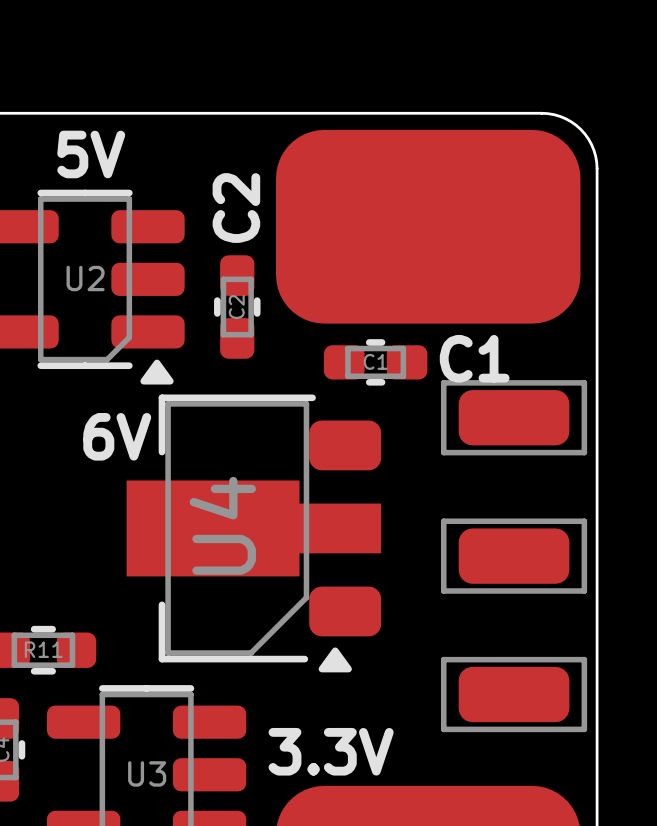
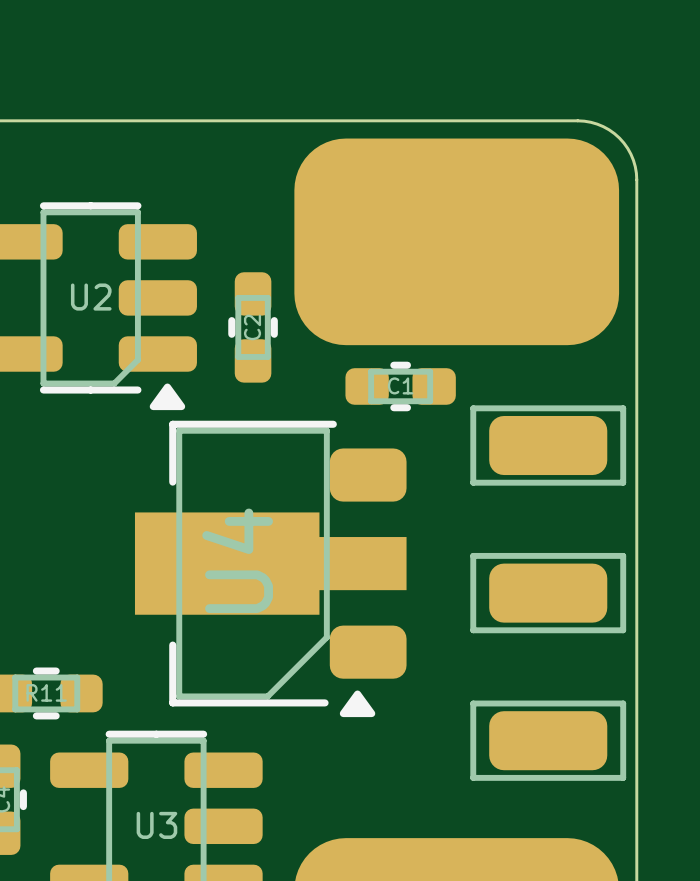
text: 5V (91, 154) -> none
text: C2 (236, 208) -> none
text: C1 (474, 358) -> none
text: 6V (117, 436) -> none
text: 3.3V (331, 751) -> none

